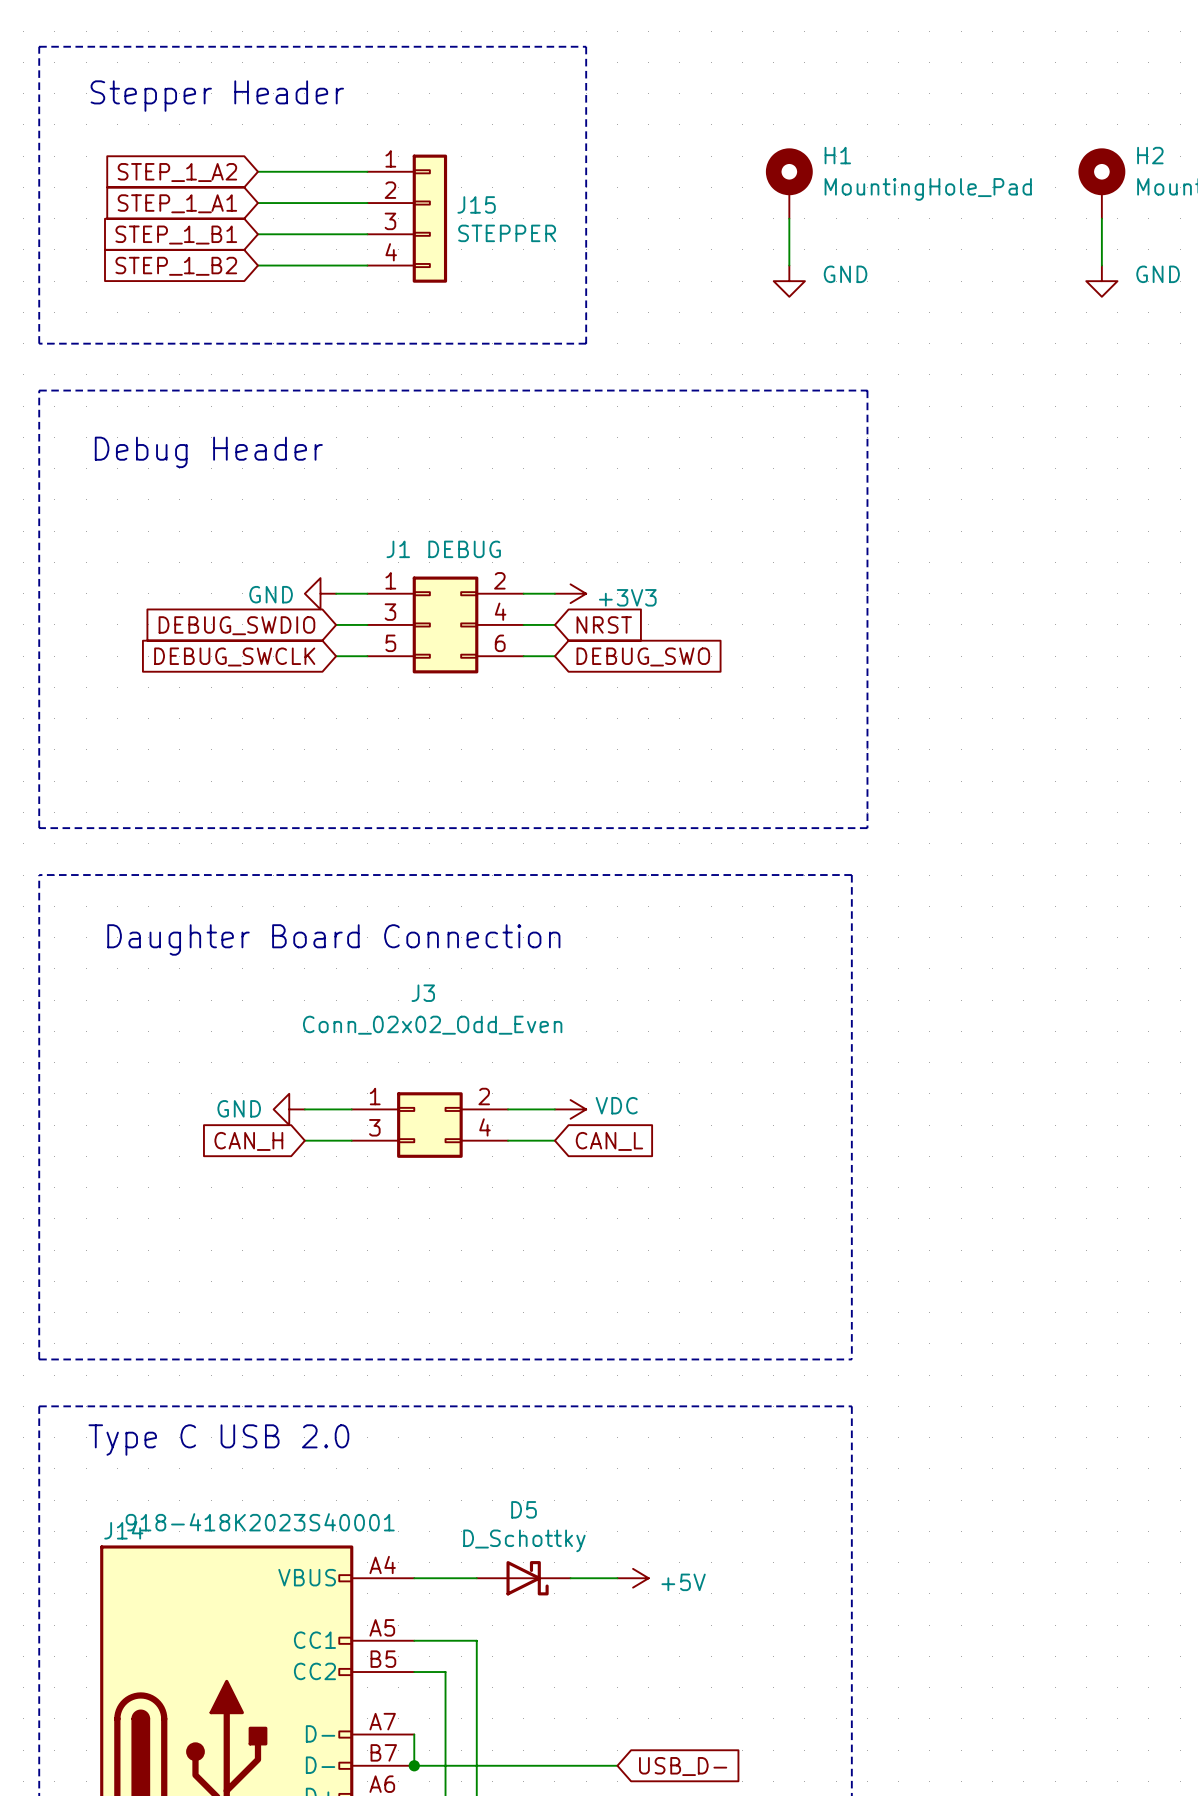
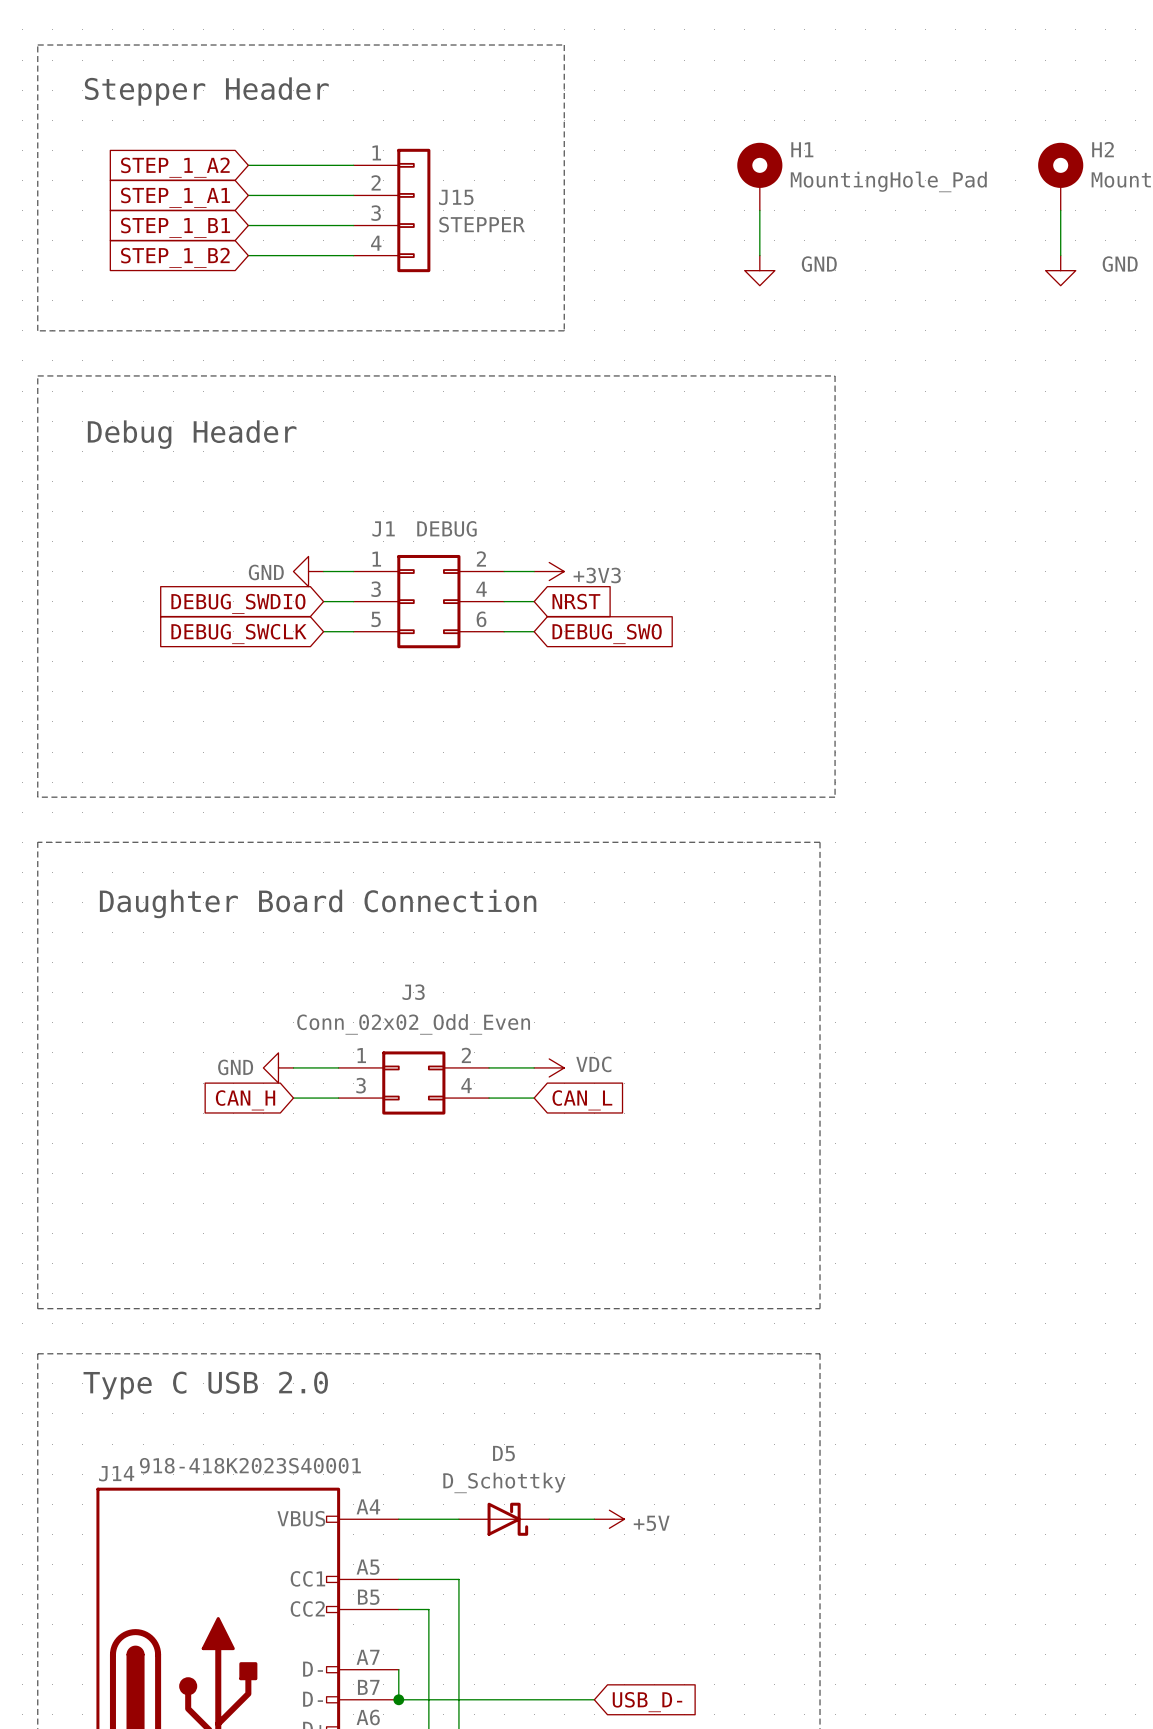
J3 name position: J3 (423, 993) -> J3 (413, 992)
J3 value position: Conn_02x02_Odd_Even (432, 1025) -> Conn_02x02_Odd_Even (413, 1024)

